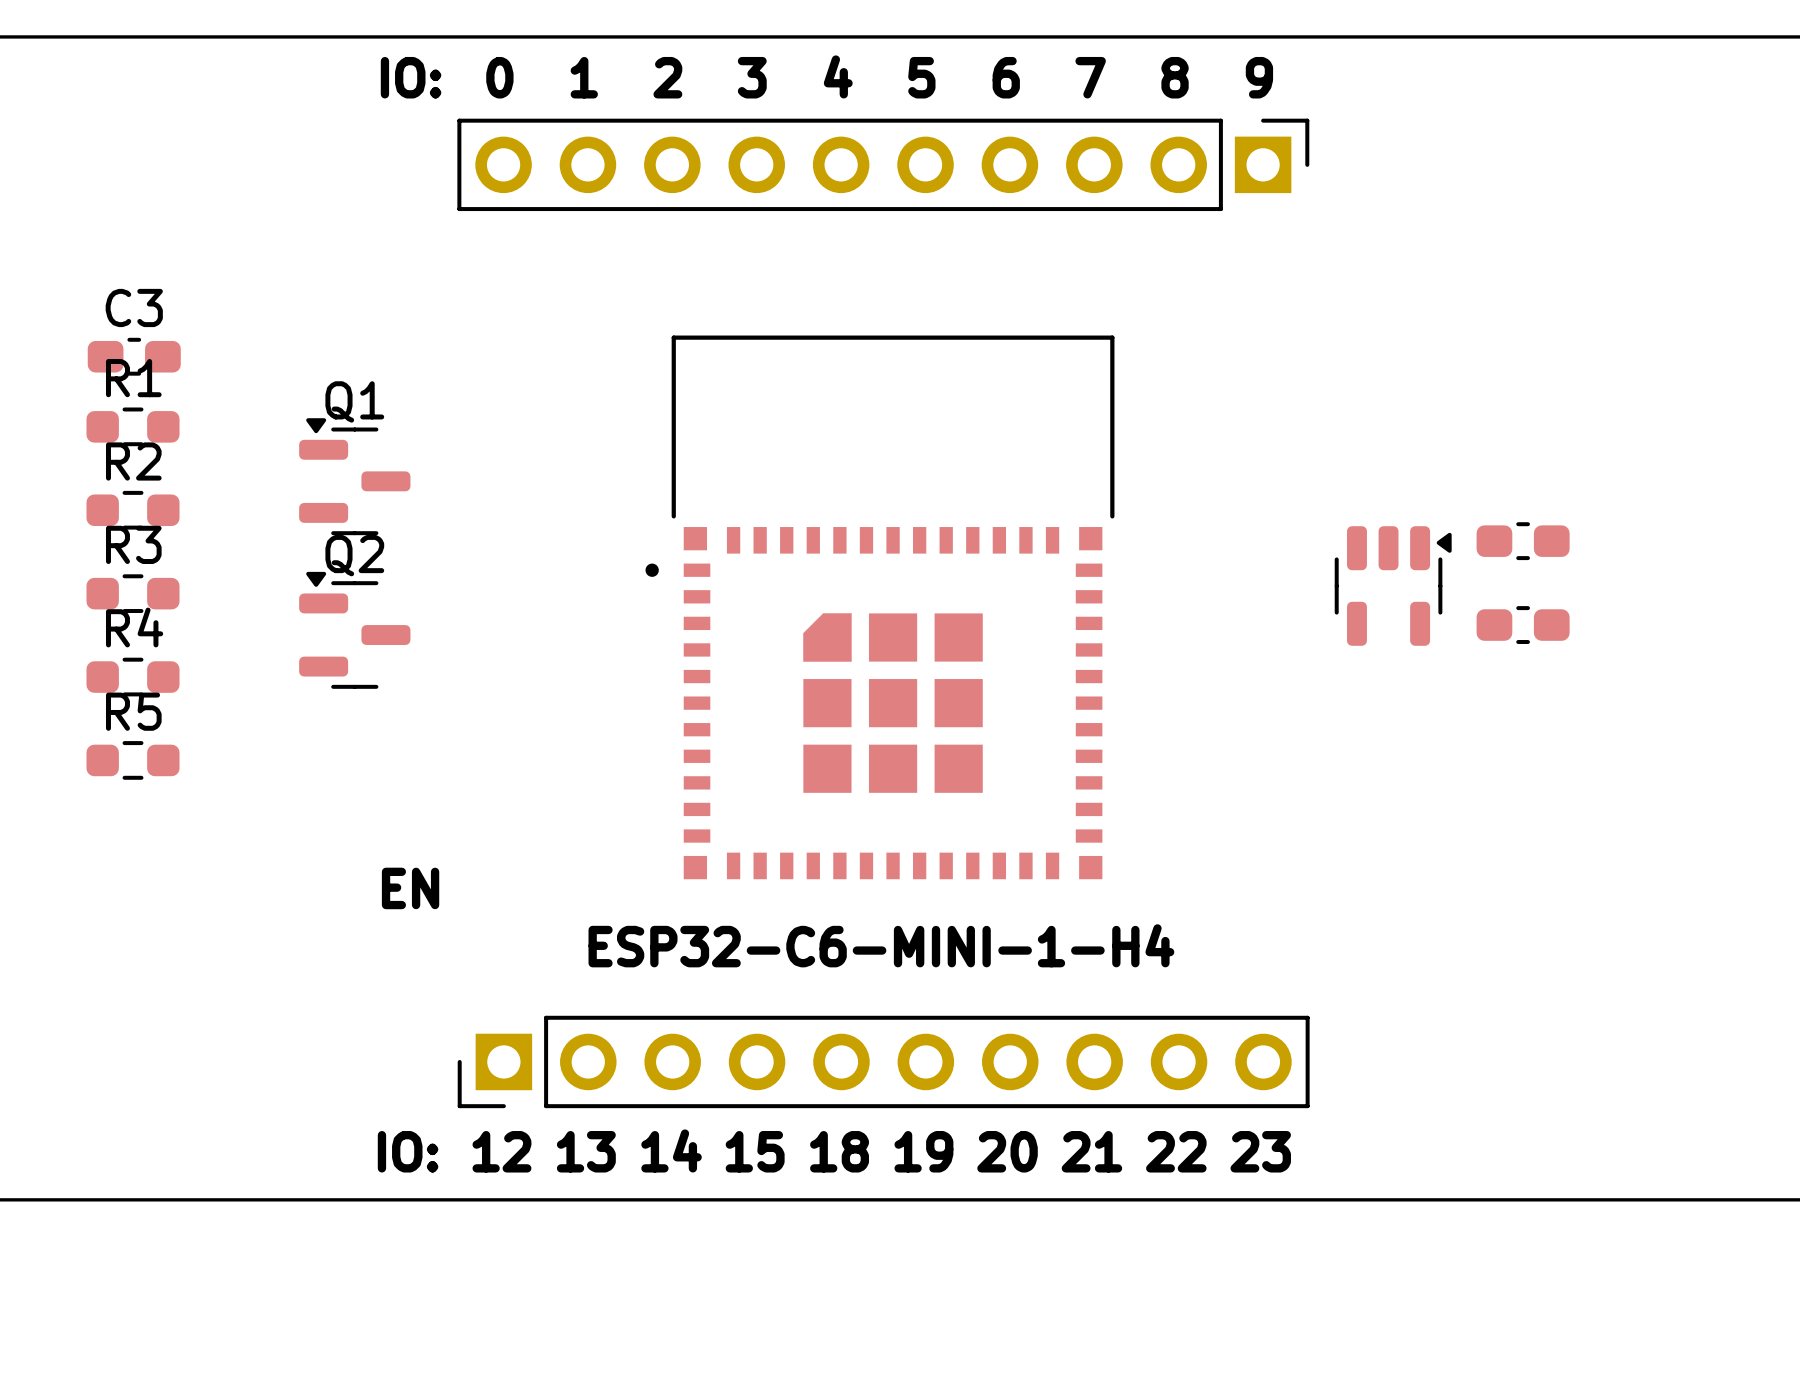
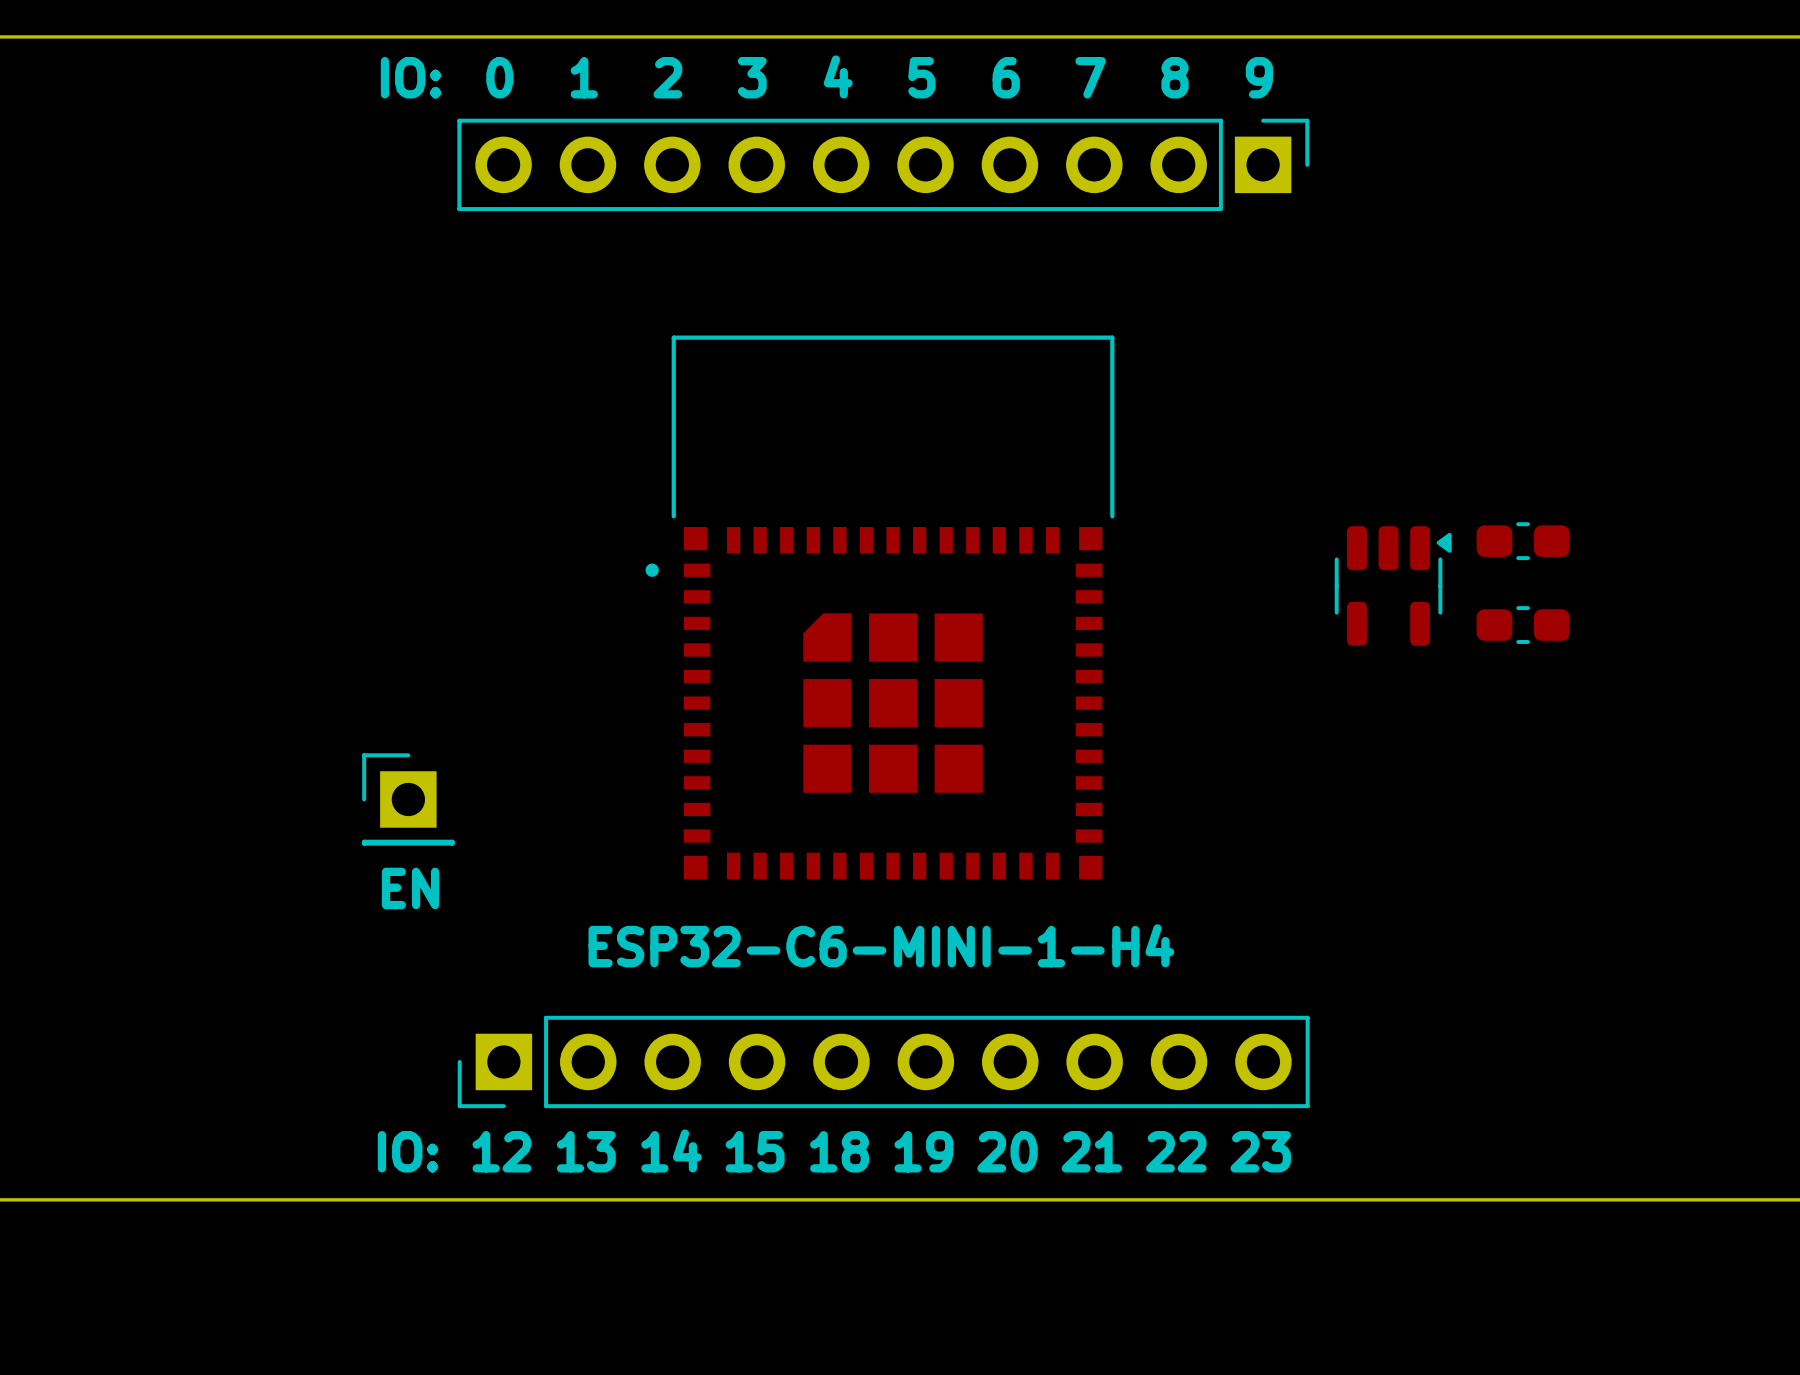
C3: (134, 356) -> none
R1: (133, 426) -> none
Q1: (354, 476) -> none
R2: (133, 510) -> none
R3: (133, 593) -> none
Q2: (354, 630) -> none
R4: (133, 677) -> none
R5: (133, 760) -> none
part: none -> (408, 799)

